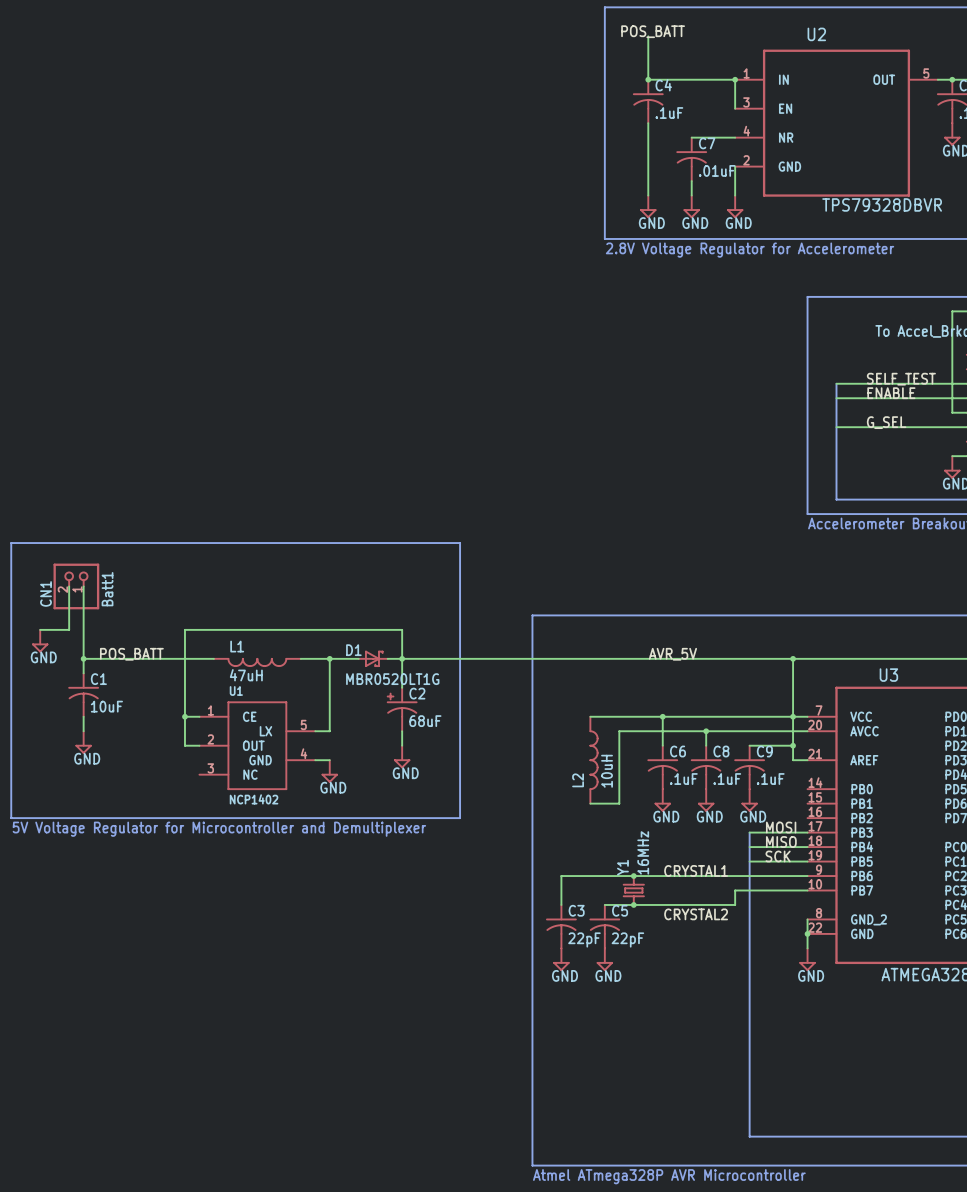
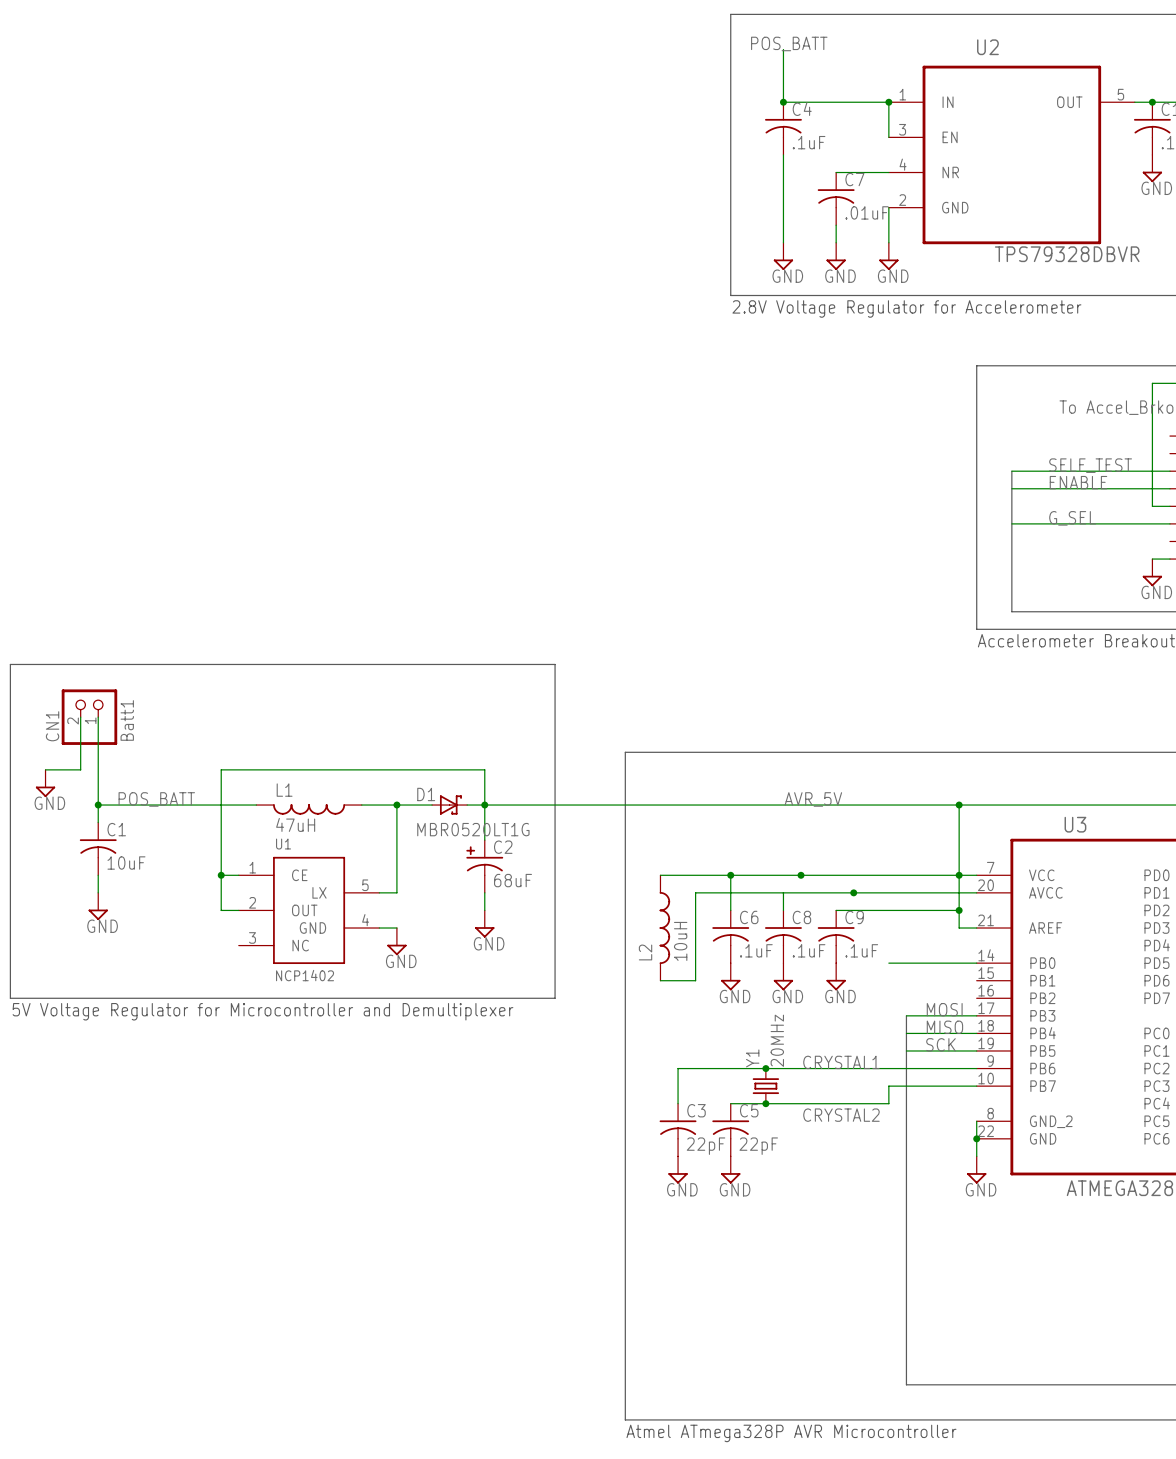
line: (532, 615) (532, 1165) -> (642, 752) (625, 752) (625, 1419) (642, 1419)
wire: none -> (660, 875) (713, 875)
junction: none -> (730, 875)
wire: (662, 716) (662, 745) -> (730, 875) (730, 910)
wire: (619, 731) (619, 803) (590, 803) -> (748, 892) (695, 892) (695, 980) (660, 980)
wire: (706, 731) (706, 745) -> (783, 892) (783, 910)
wire: none -> (836, 910) (906, 910)
L2 position: (593, 760) -> (664, 928)
C6 position: (662, 767) -> (730, 936)
C8 position: (706, 767) -> (783, 936)
C9 position: (749, 767) -> (836, 936)
wire: none -> (888, 963) (976, 963)
power symbol: none -> GND (730, 976)
power symbol: none -> GND (783, 976)
power symbol: GND (662, 800) -> none
power symbol: none -> GND (836, 976)
power symbol: GND (706, 800) -> none
power symbol: GND (749, 800) -> none
Y1 value: 16MHz (643, 852) -> 20MHz (777, 1040)
text position: Atmel ATmega328P AVR Microcontroller (669, 1176) -> Atmel ATmega328P AVR Microcontroller (791, 1433)

